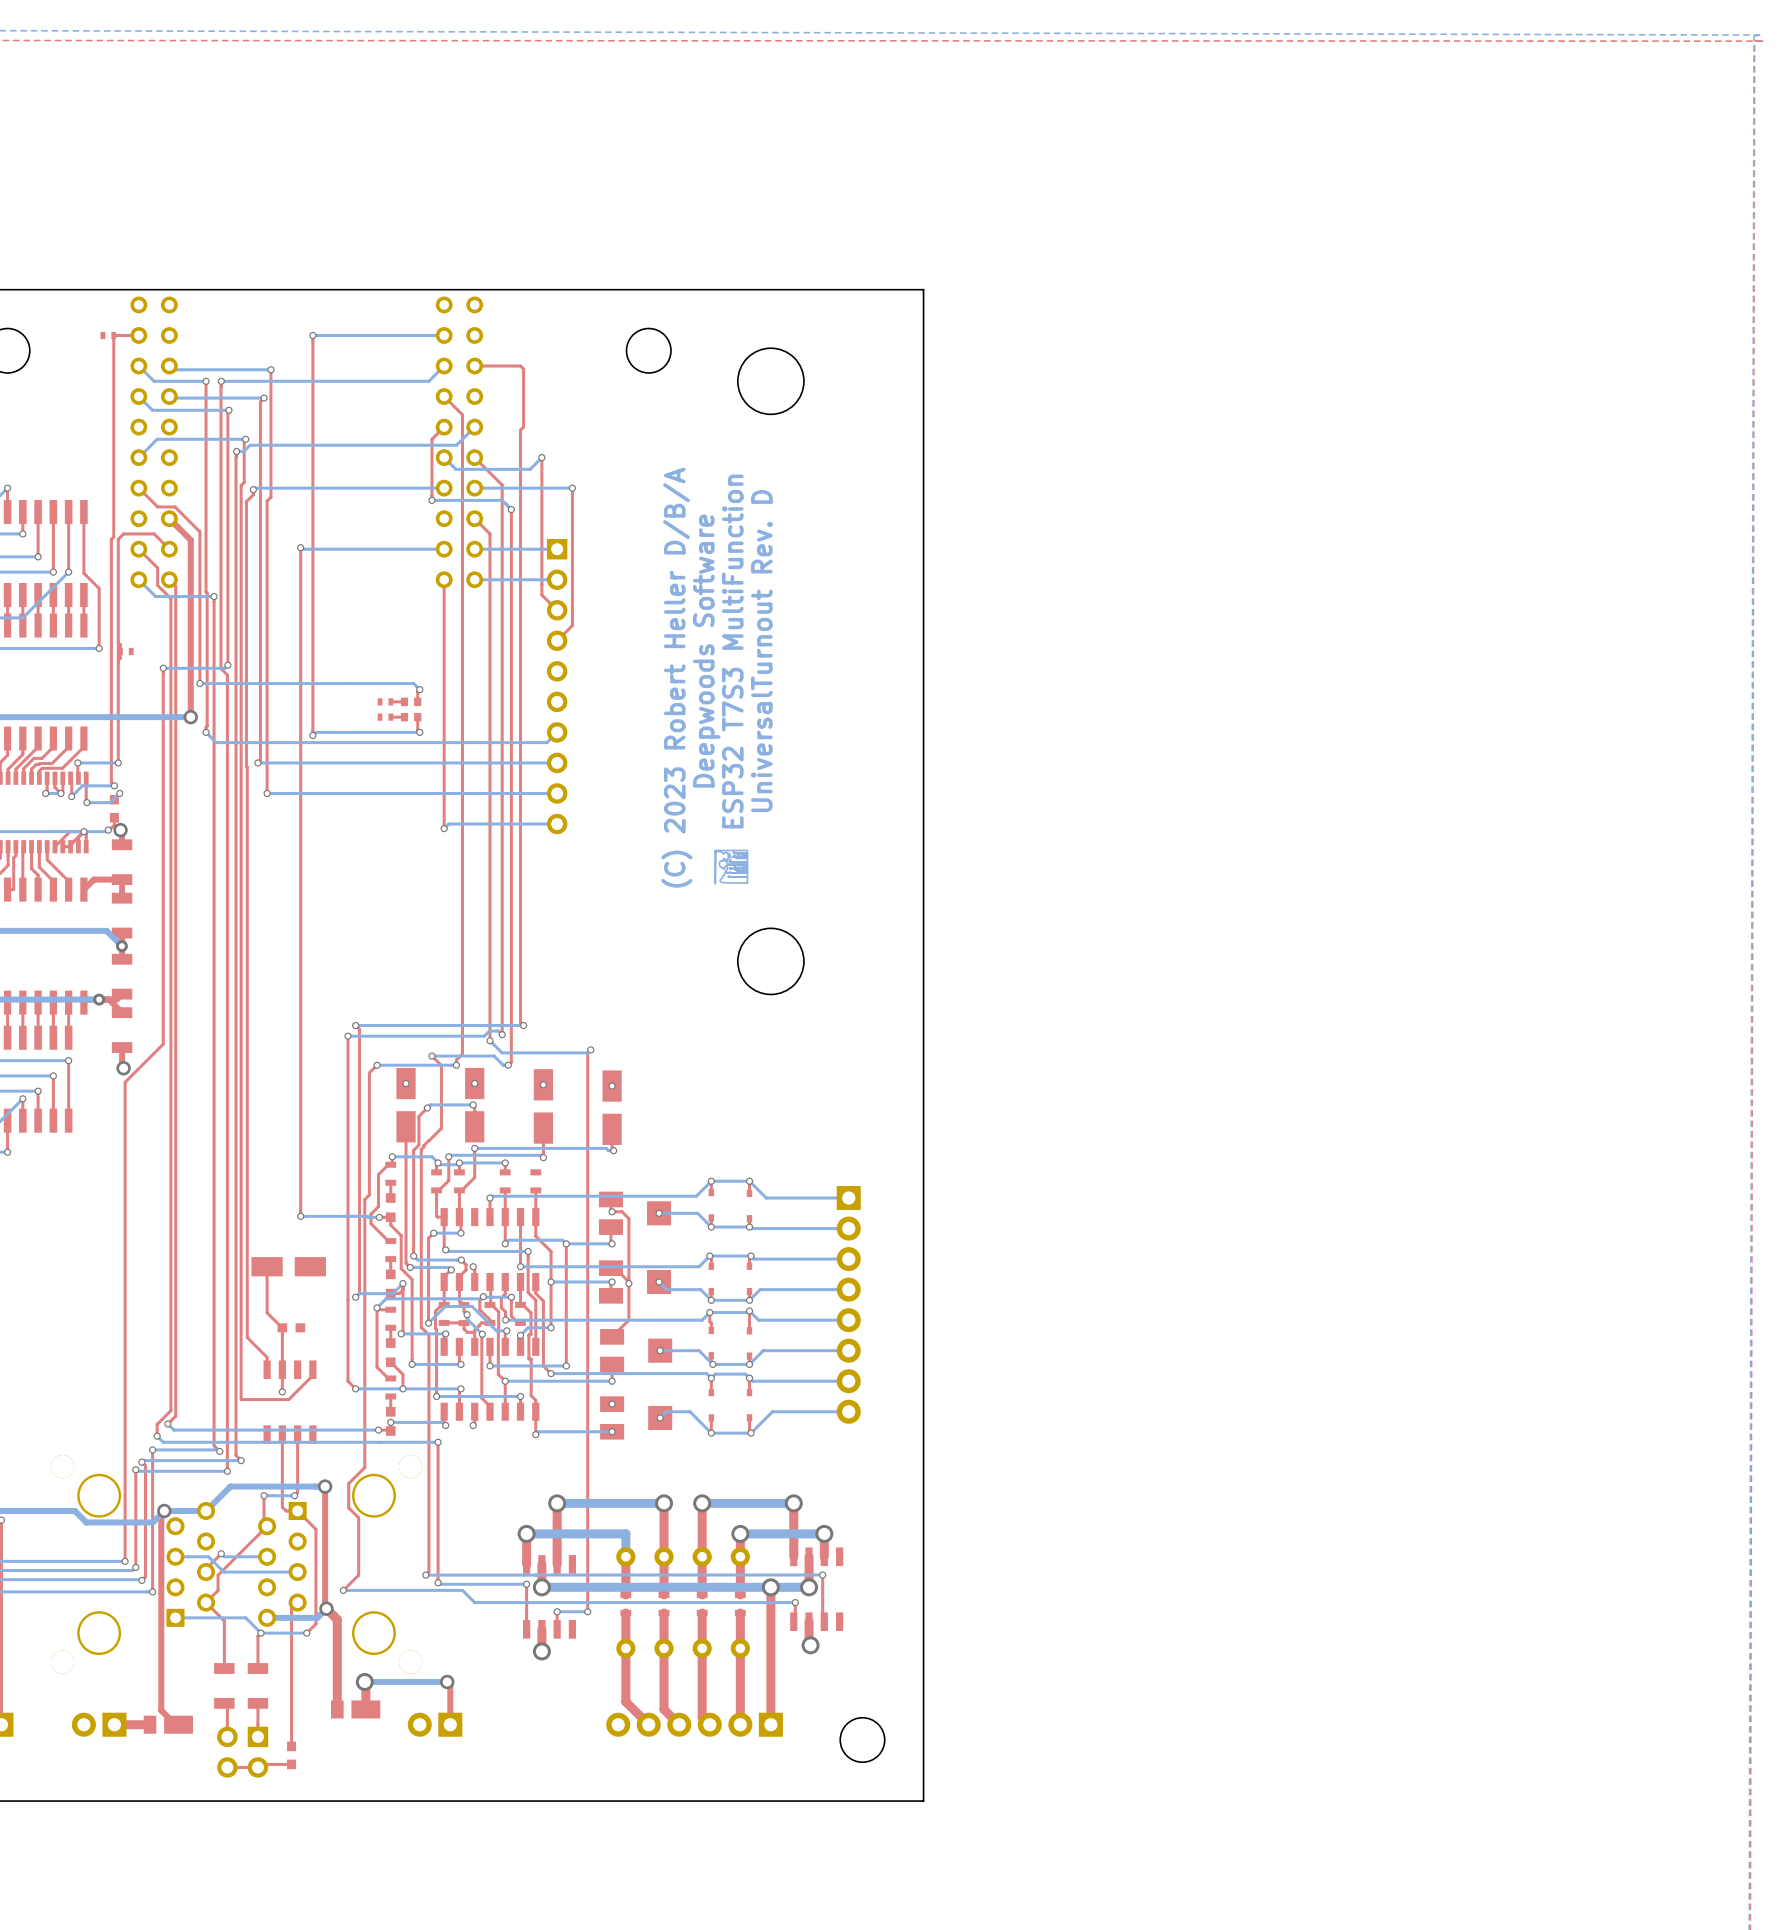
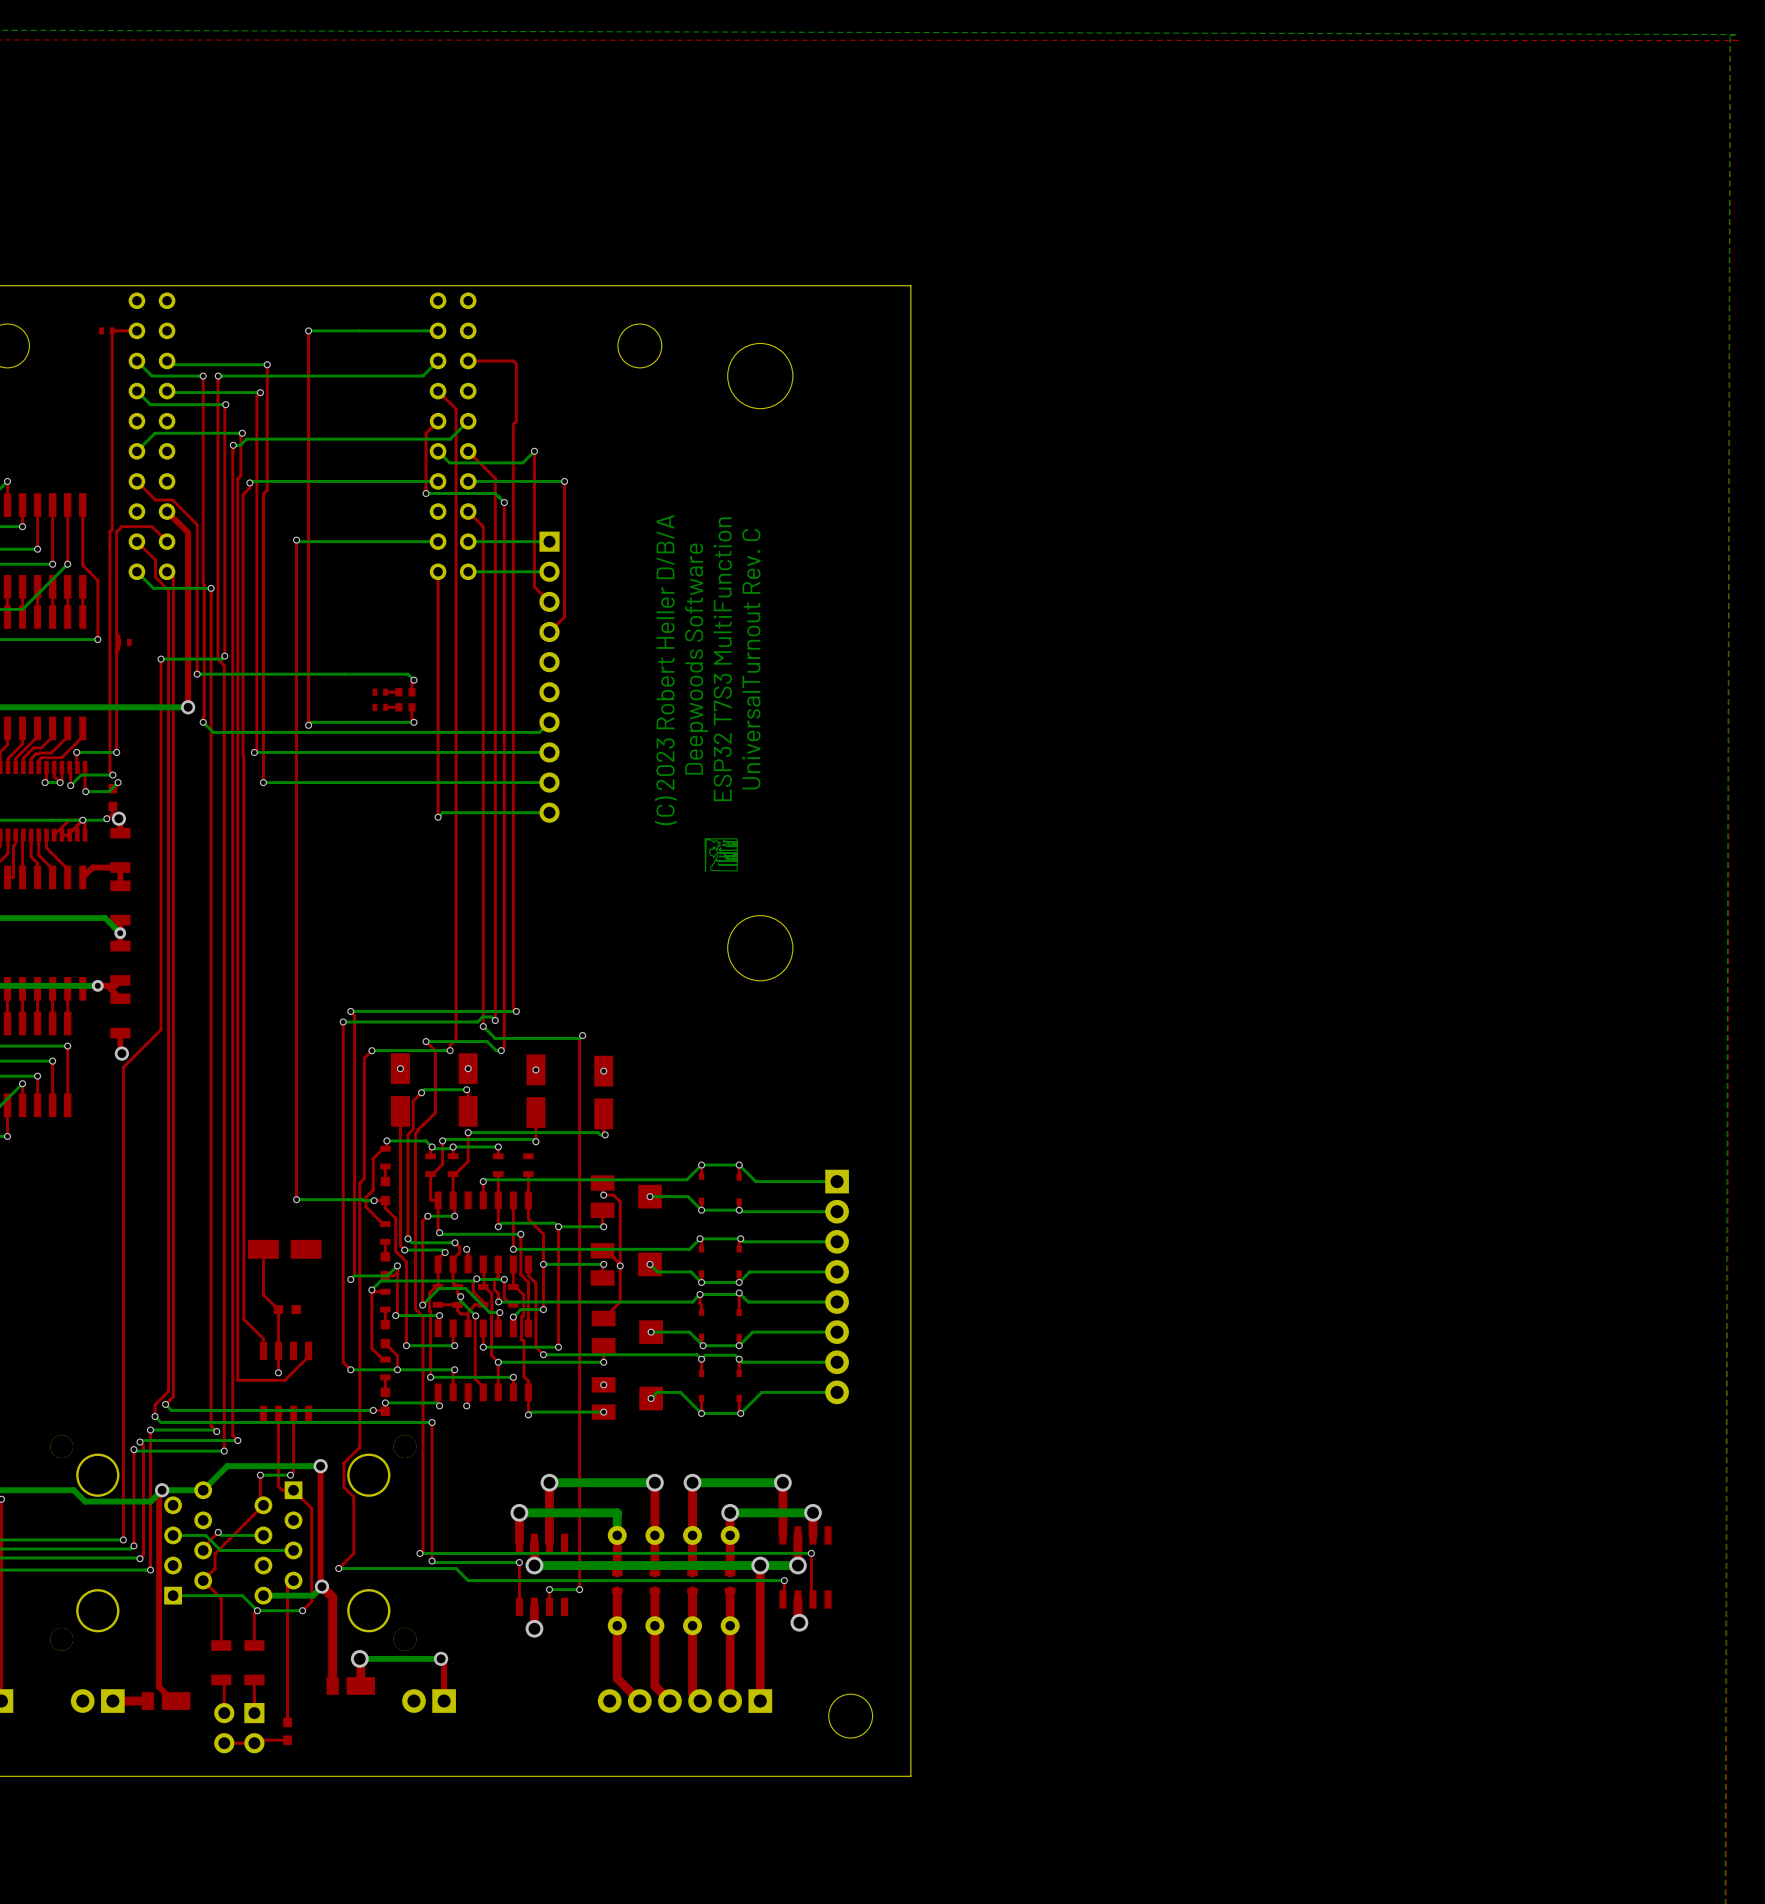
text: UniversalTurnout Rev. D (761, 651) -> UniversalTurnout Rev. C (751, 659)

